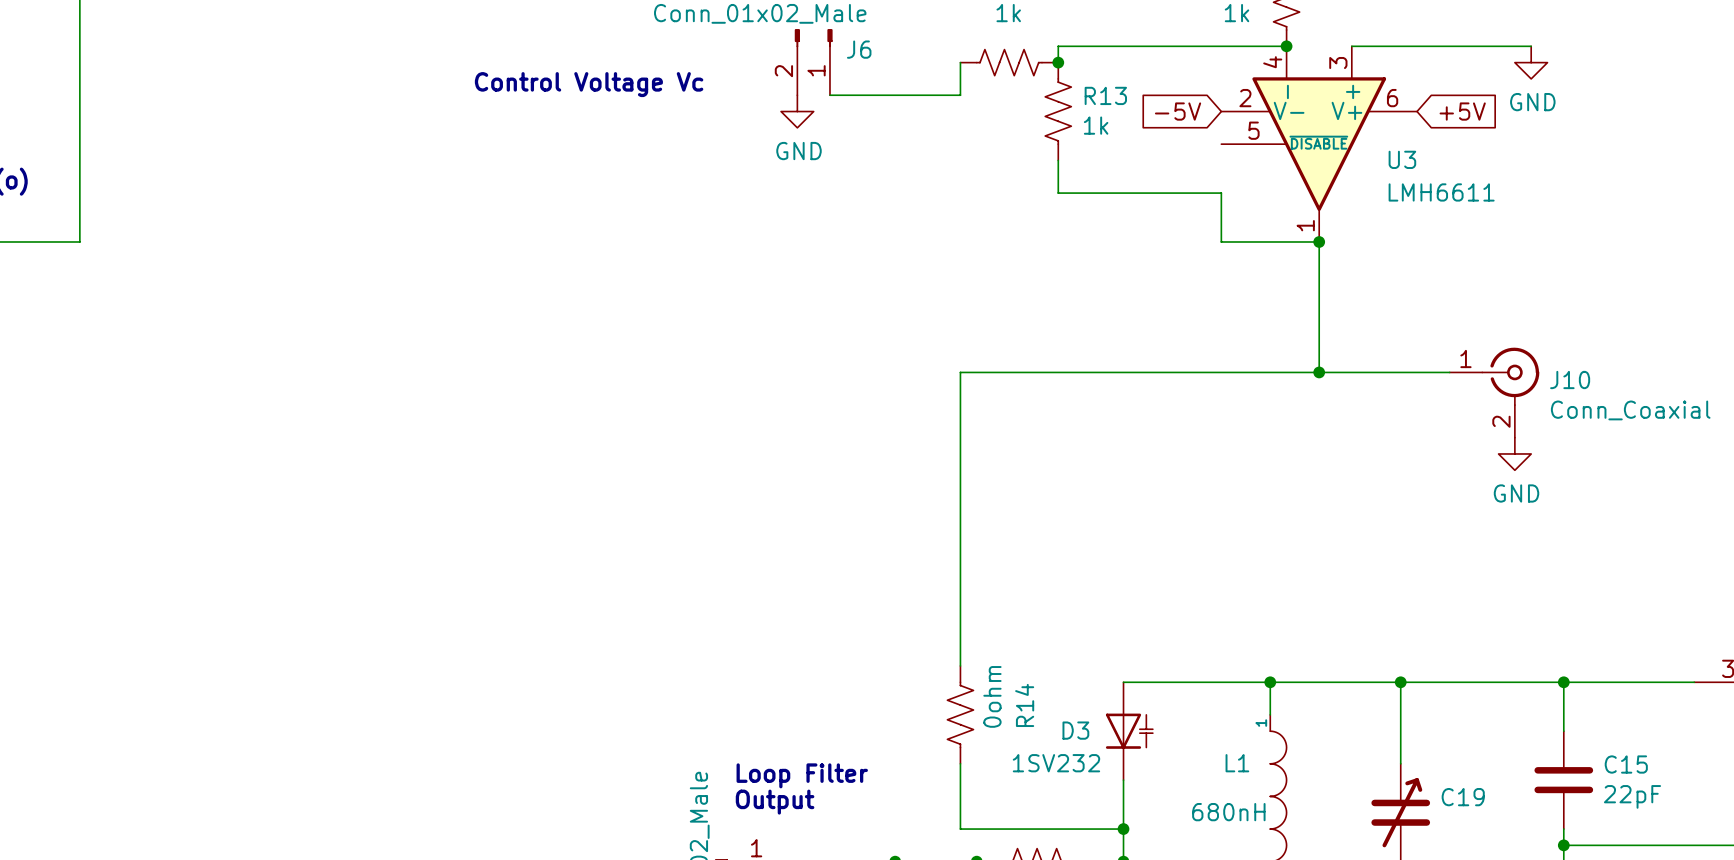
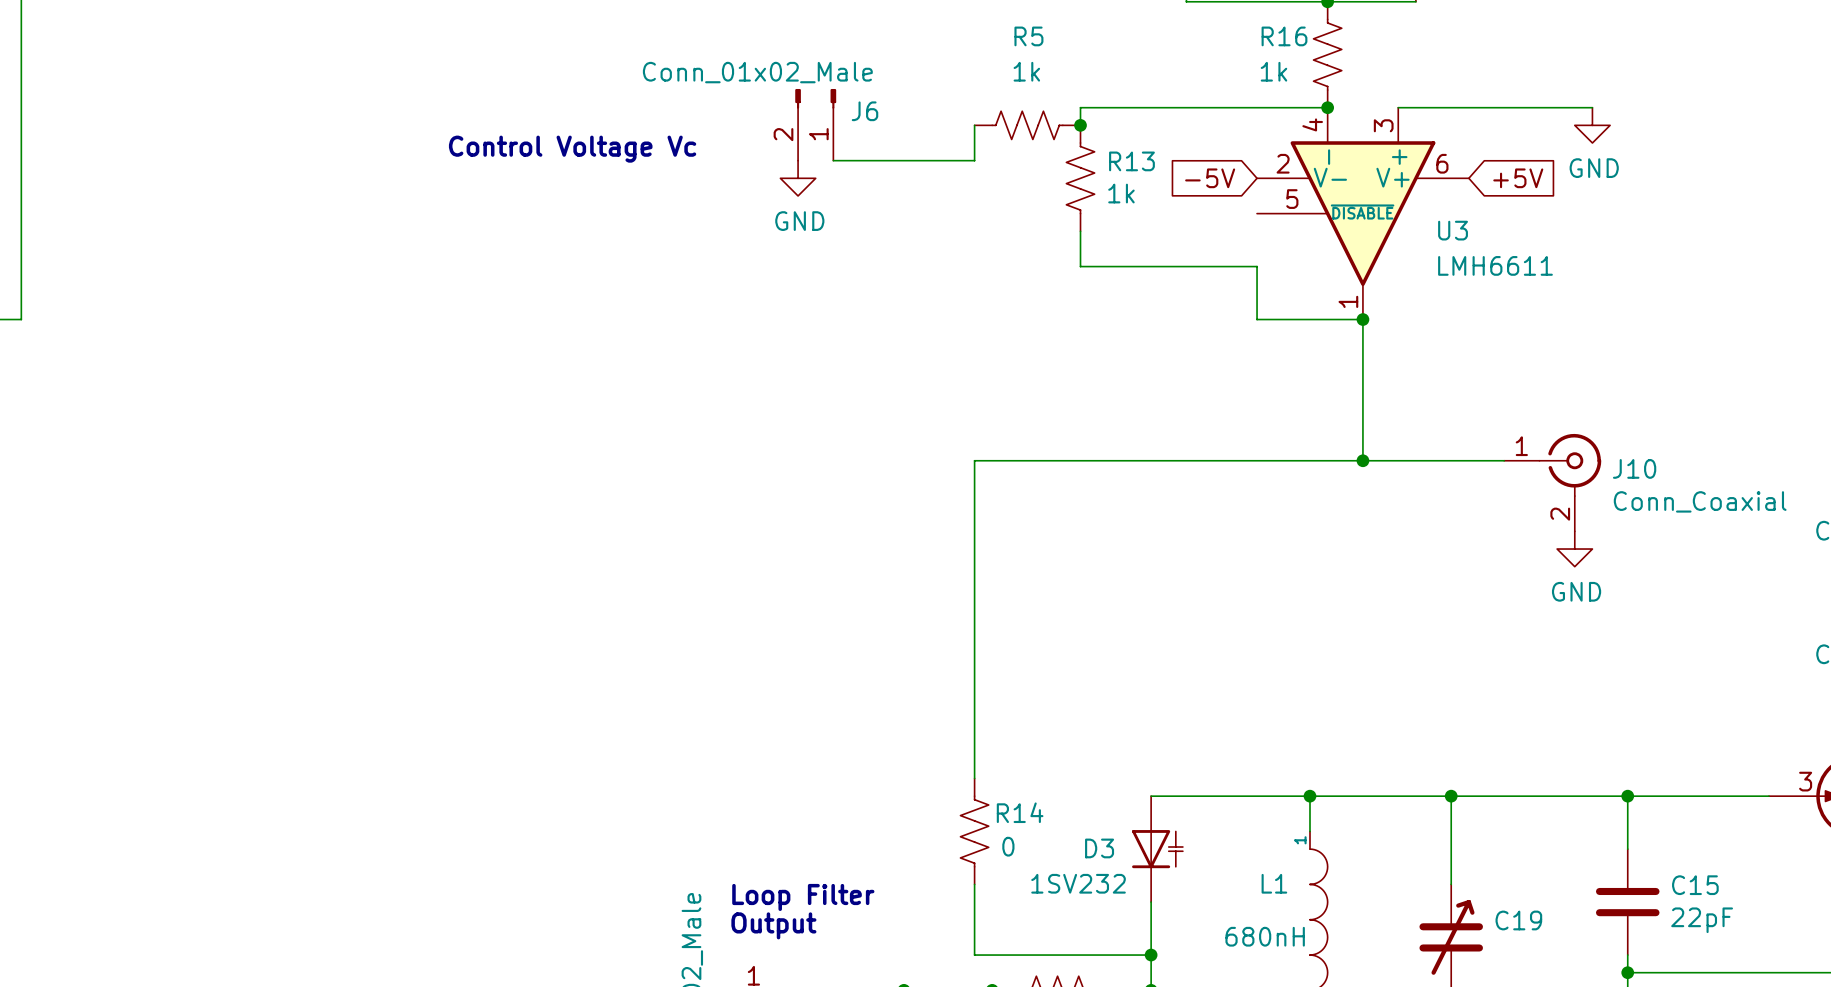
R14 value: 0ohm (992, 696) -> 0 (1008, 846)
R14 name rotation: 0° (1024, 705) -> 90° clockwise (1020, 812)

